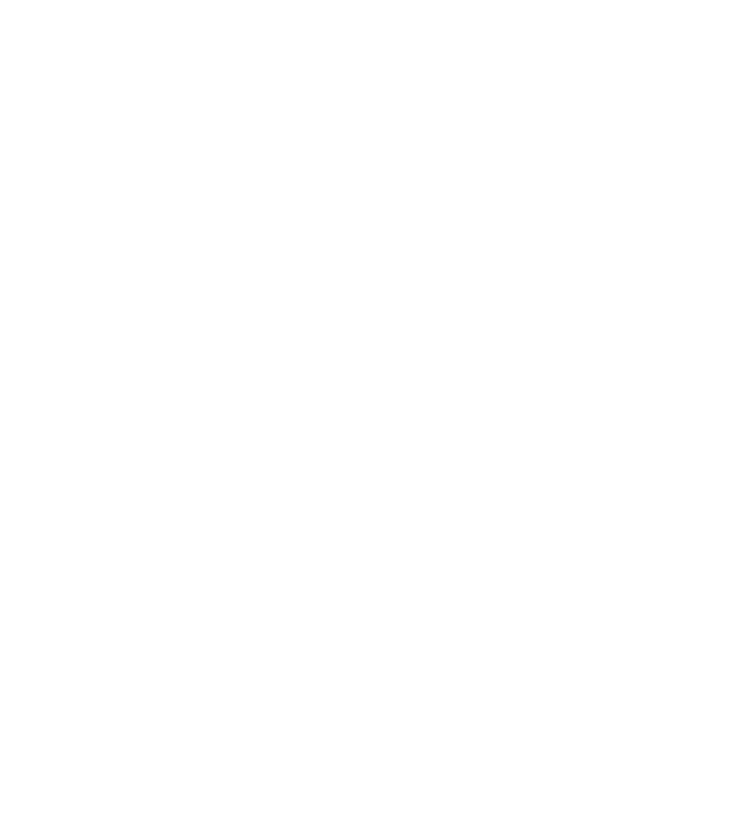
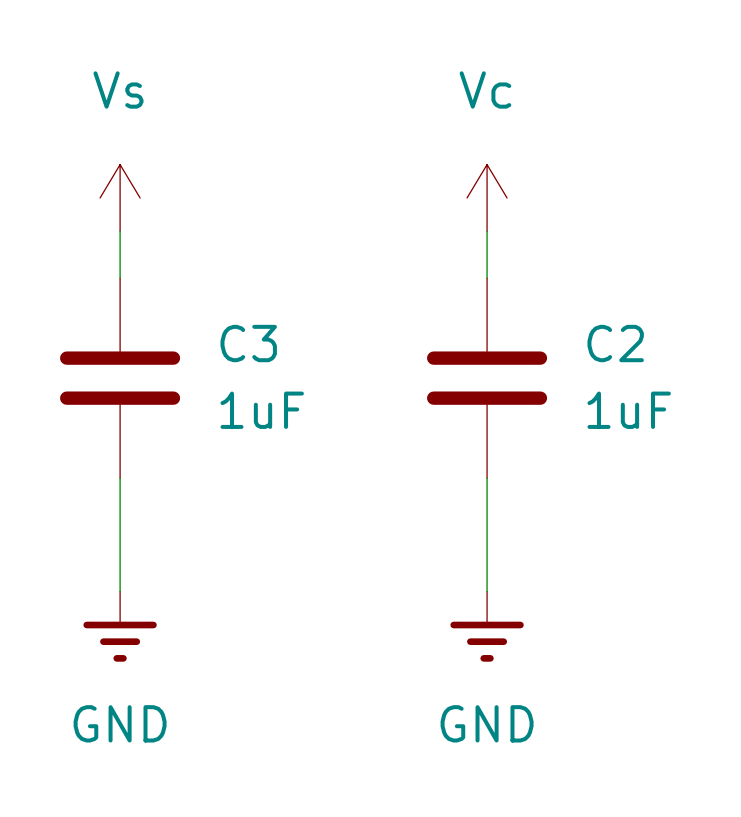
power symbol: none -> Vs (120, 197)
power symbol: none -> Vc (487, 197)
wire: none -> (120, 231) (120, 278)
wire: none -> (487, 231) (487, 278)
C3: none -> 1uF (120, 378)
C2: none -> 1uF (487, 378)
wire: none -> (120, 478) (120, 591)
wire: none -> (487, 478) (487, 591)
power symbol: none -> GND (120, 626)
power symbol: none -> GND (487, 626)

